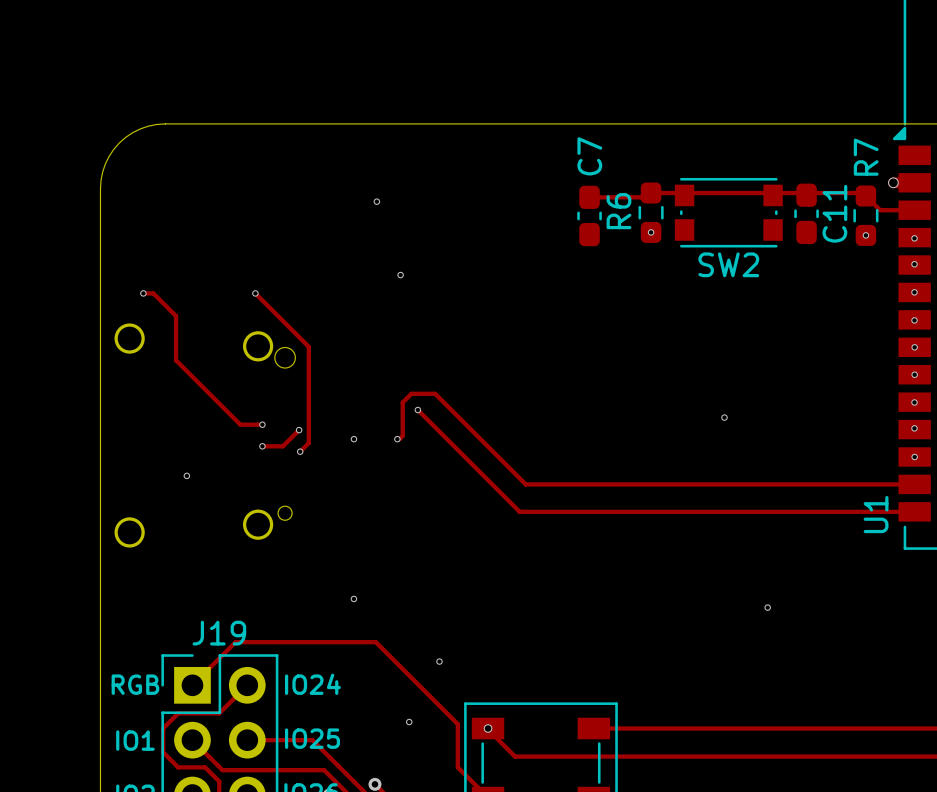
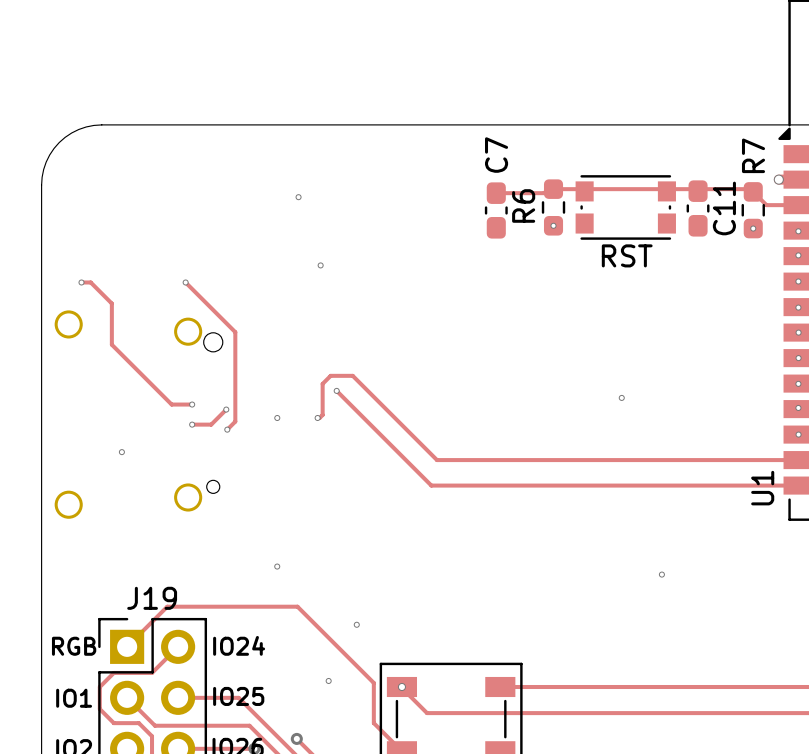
SW2 name: SW2 (728, 264) -> RST (627, 255)

